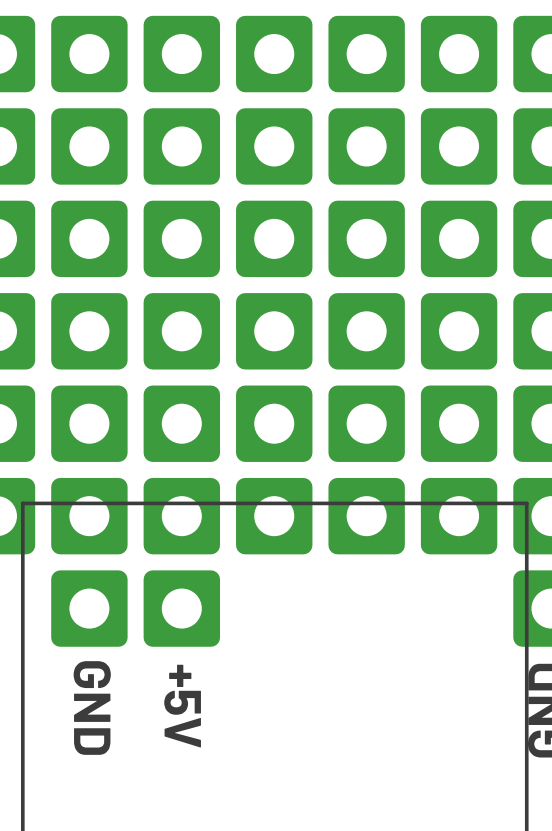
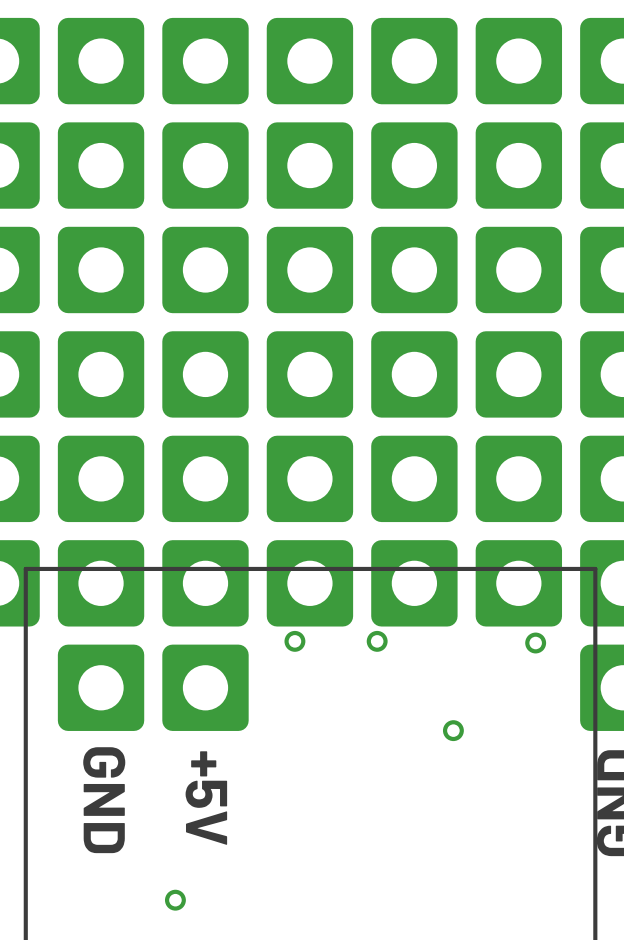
via: none -> (294, 641)
via: none -> (377, 641)
via: none -> (535, 643)
via: none -> (453, 730)
via: none -> (175, 900)

